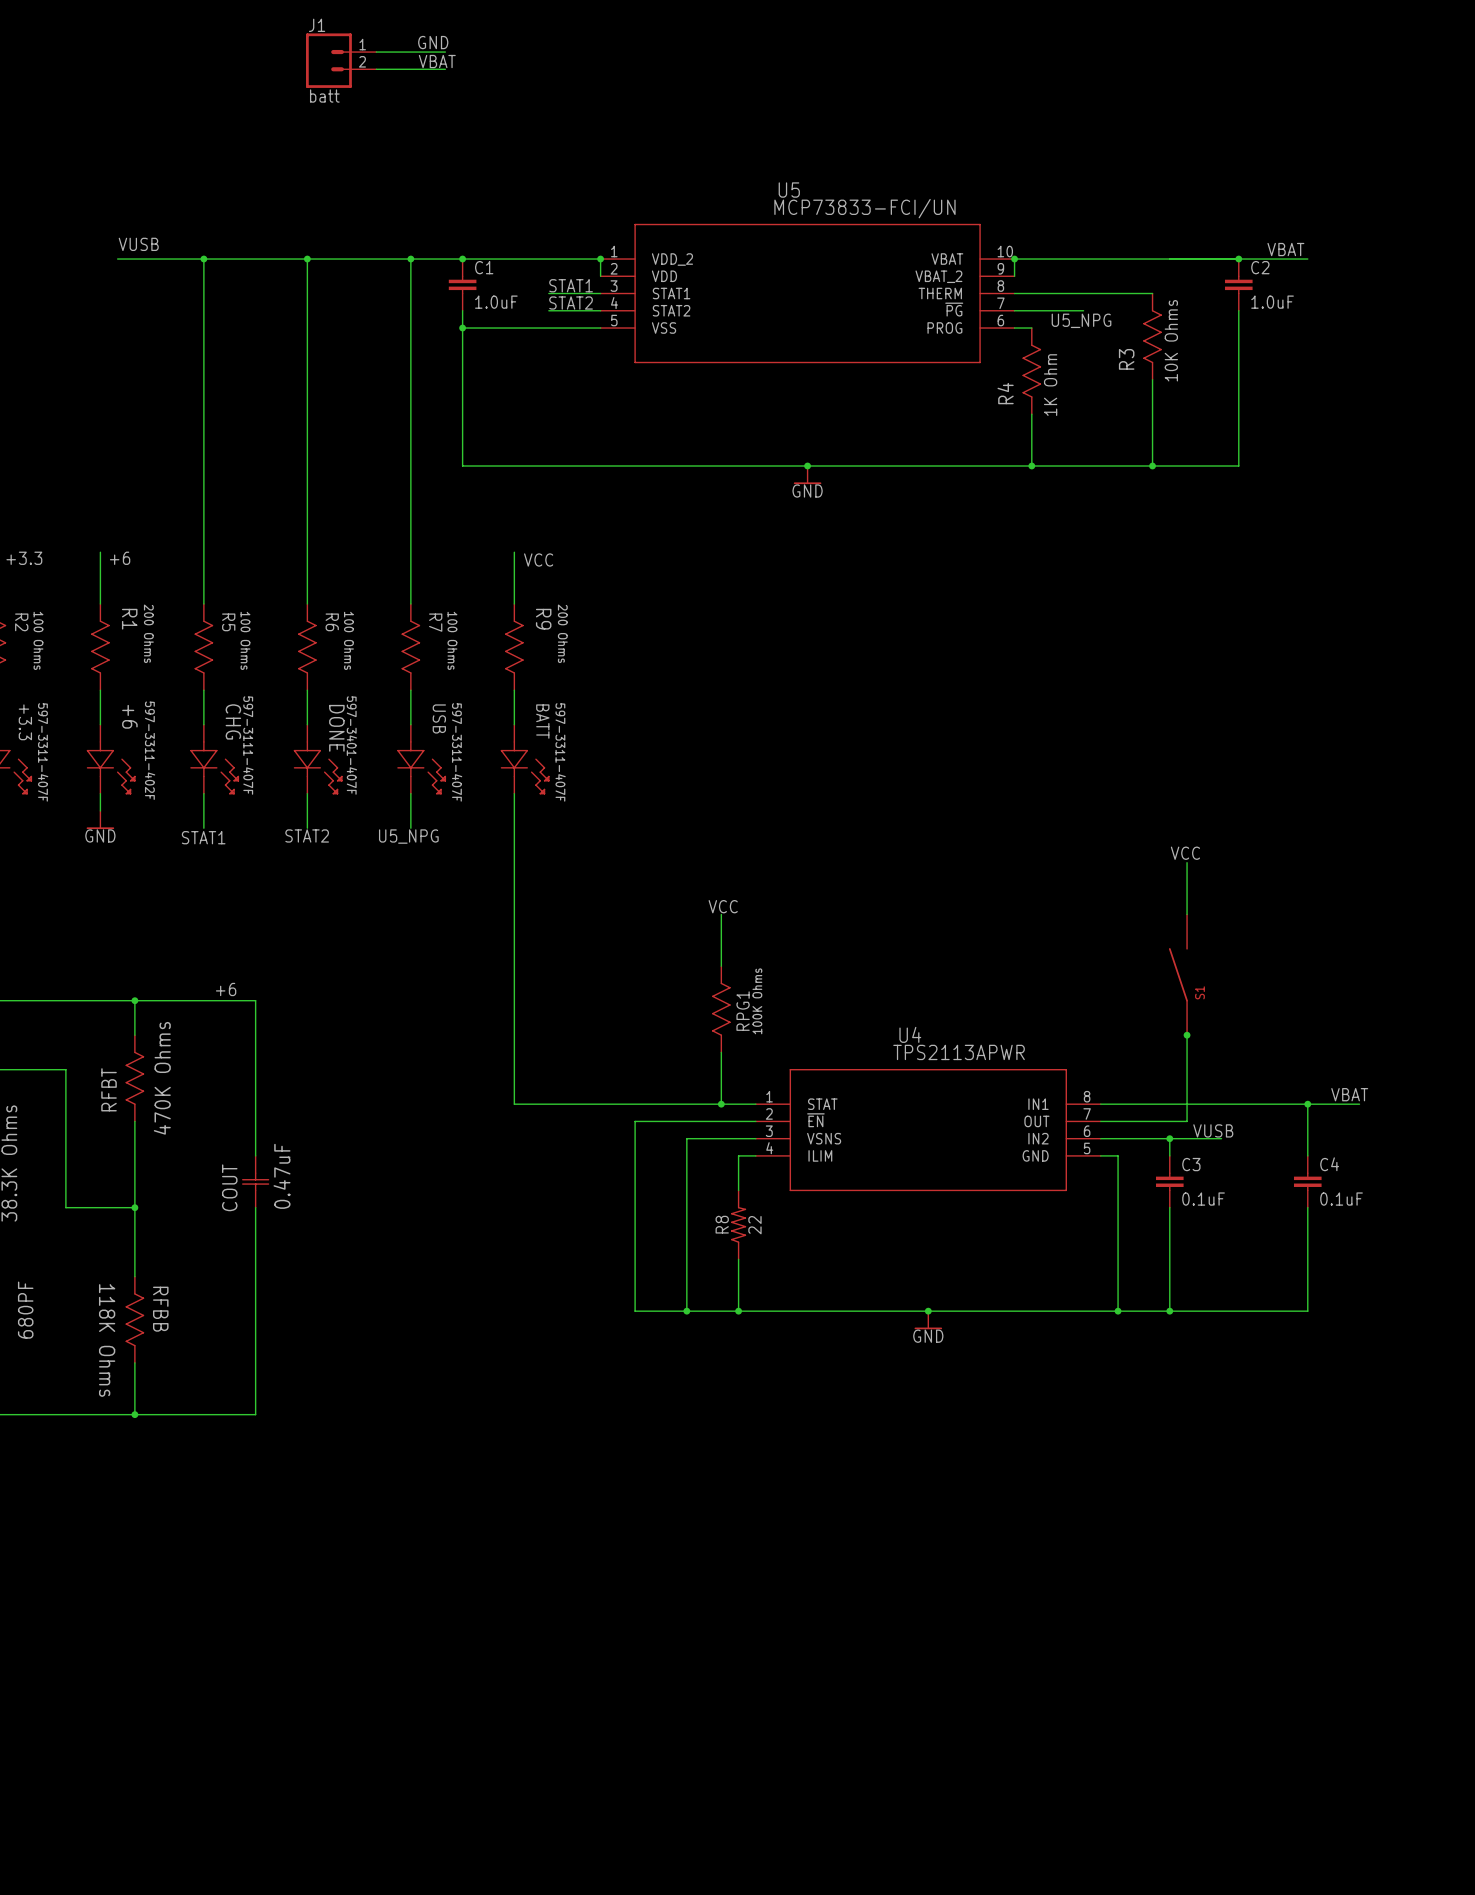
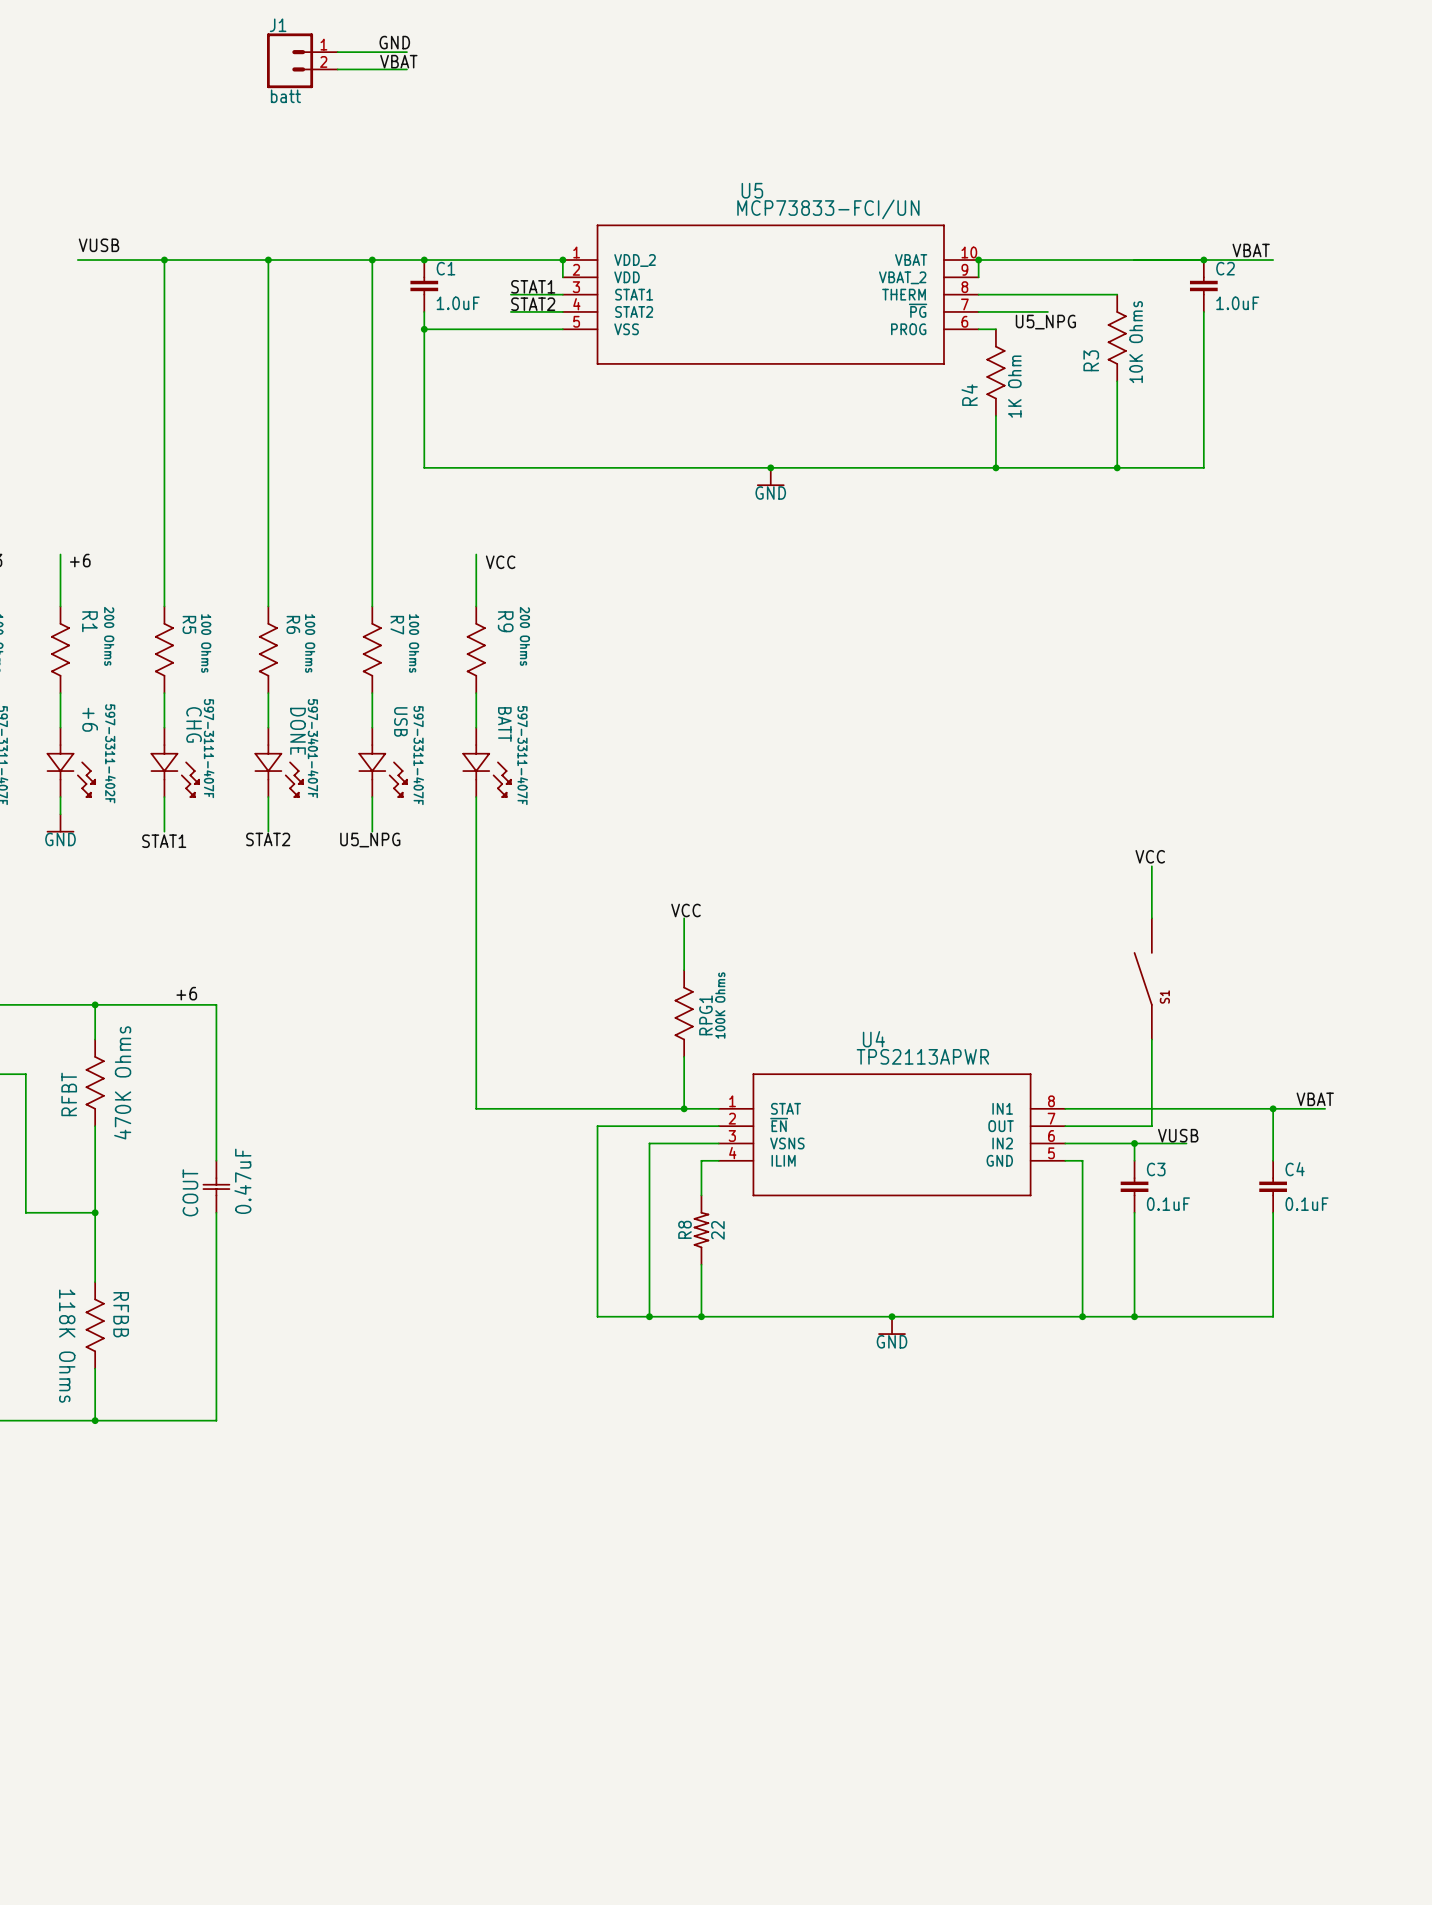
junction: (1187, 1035) -> none

